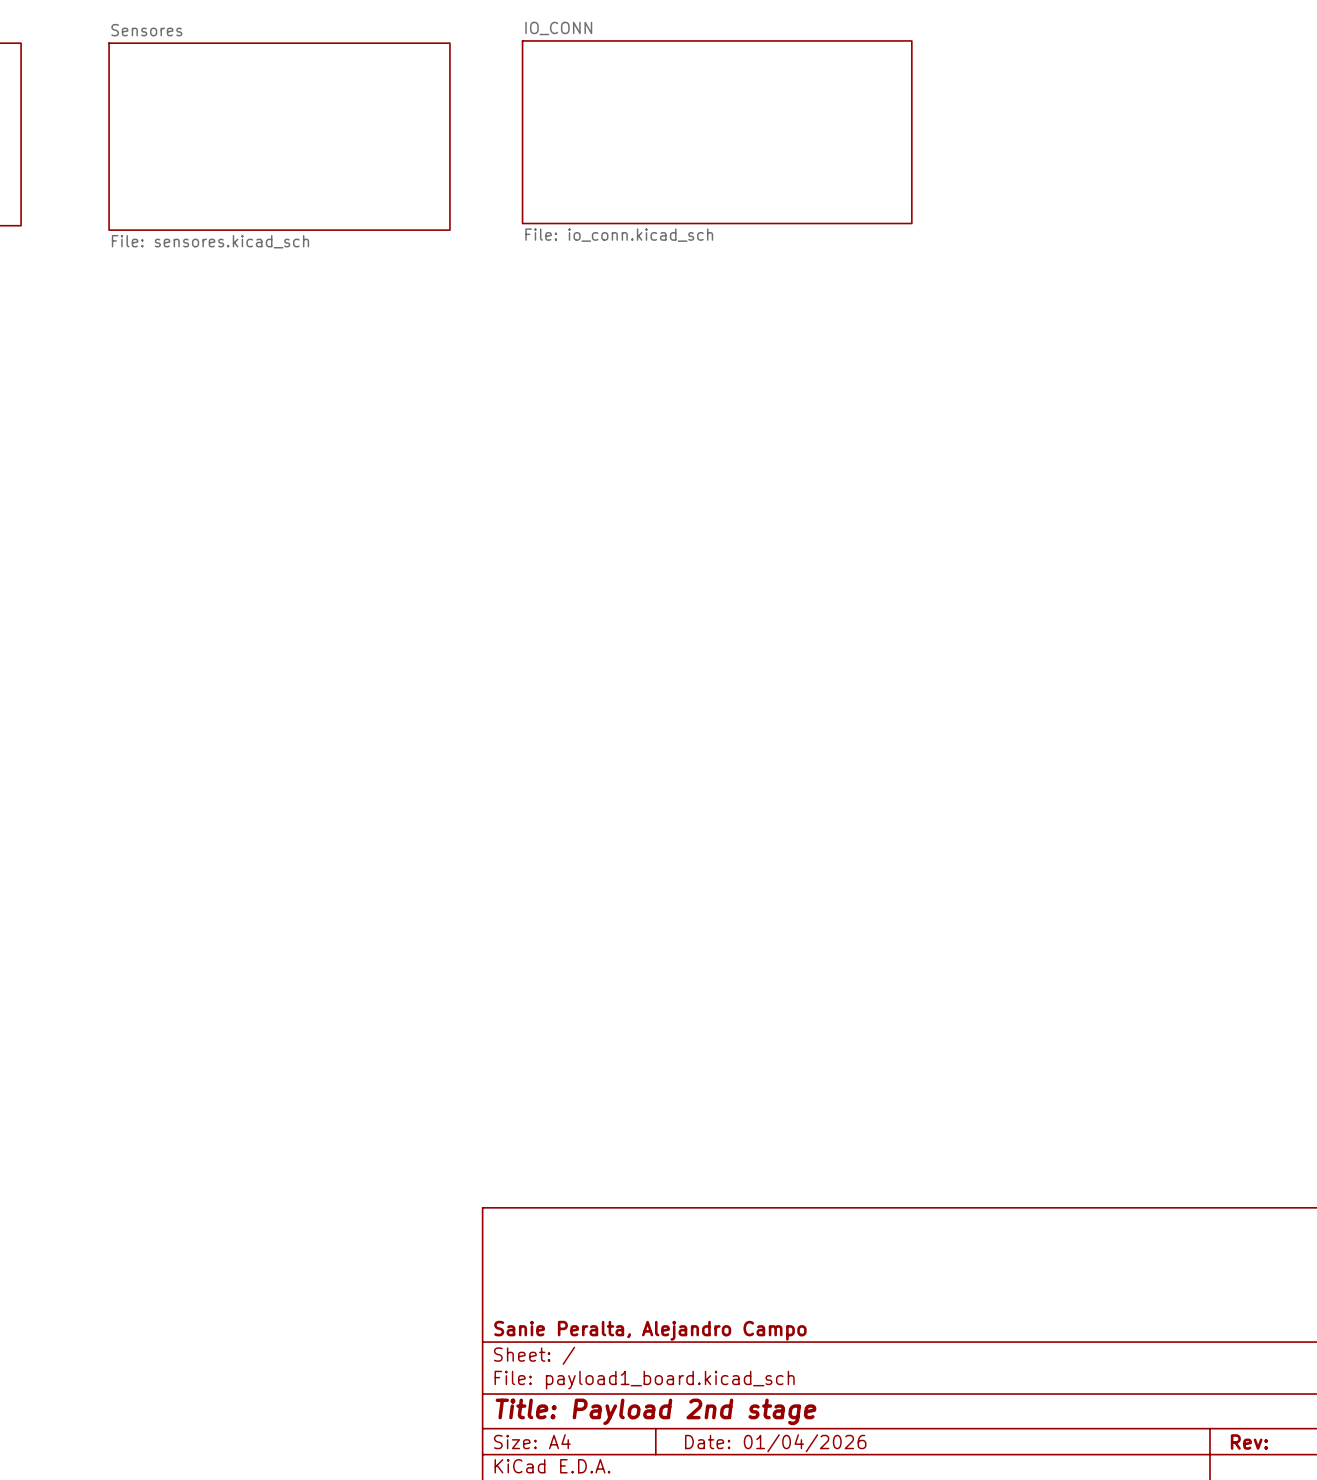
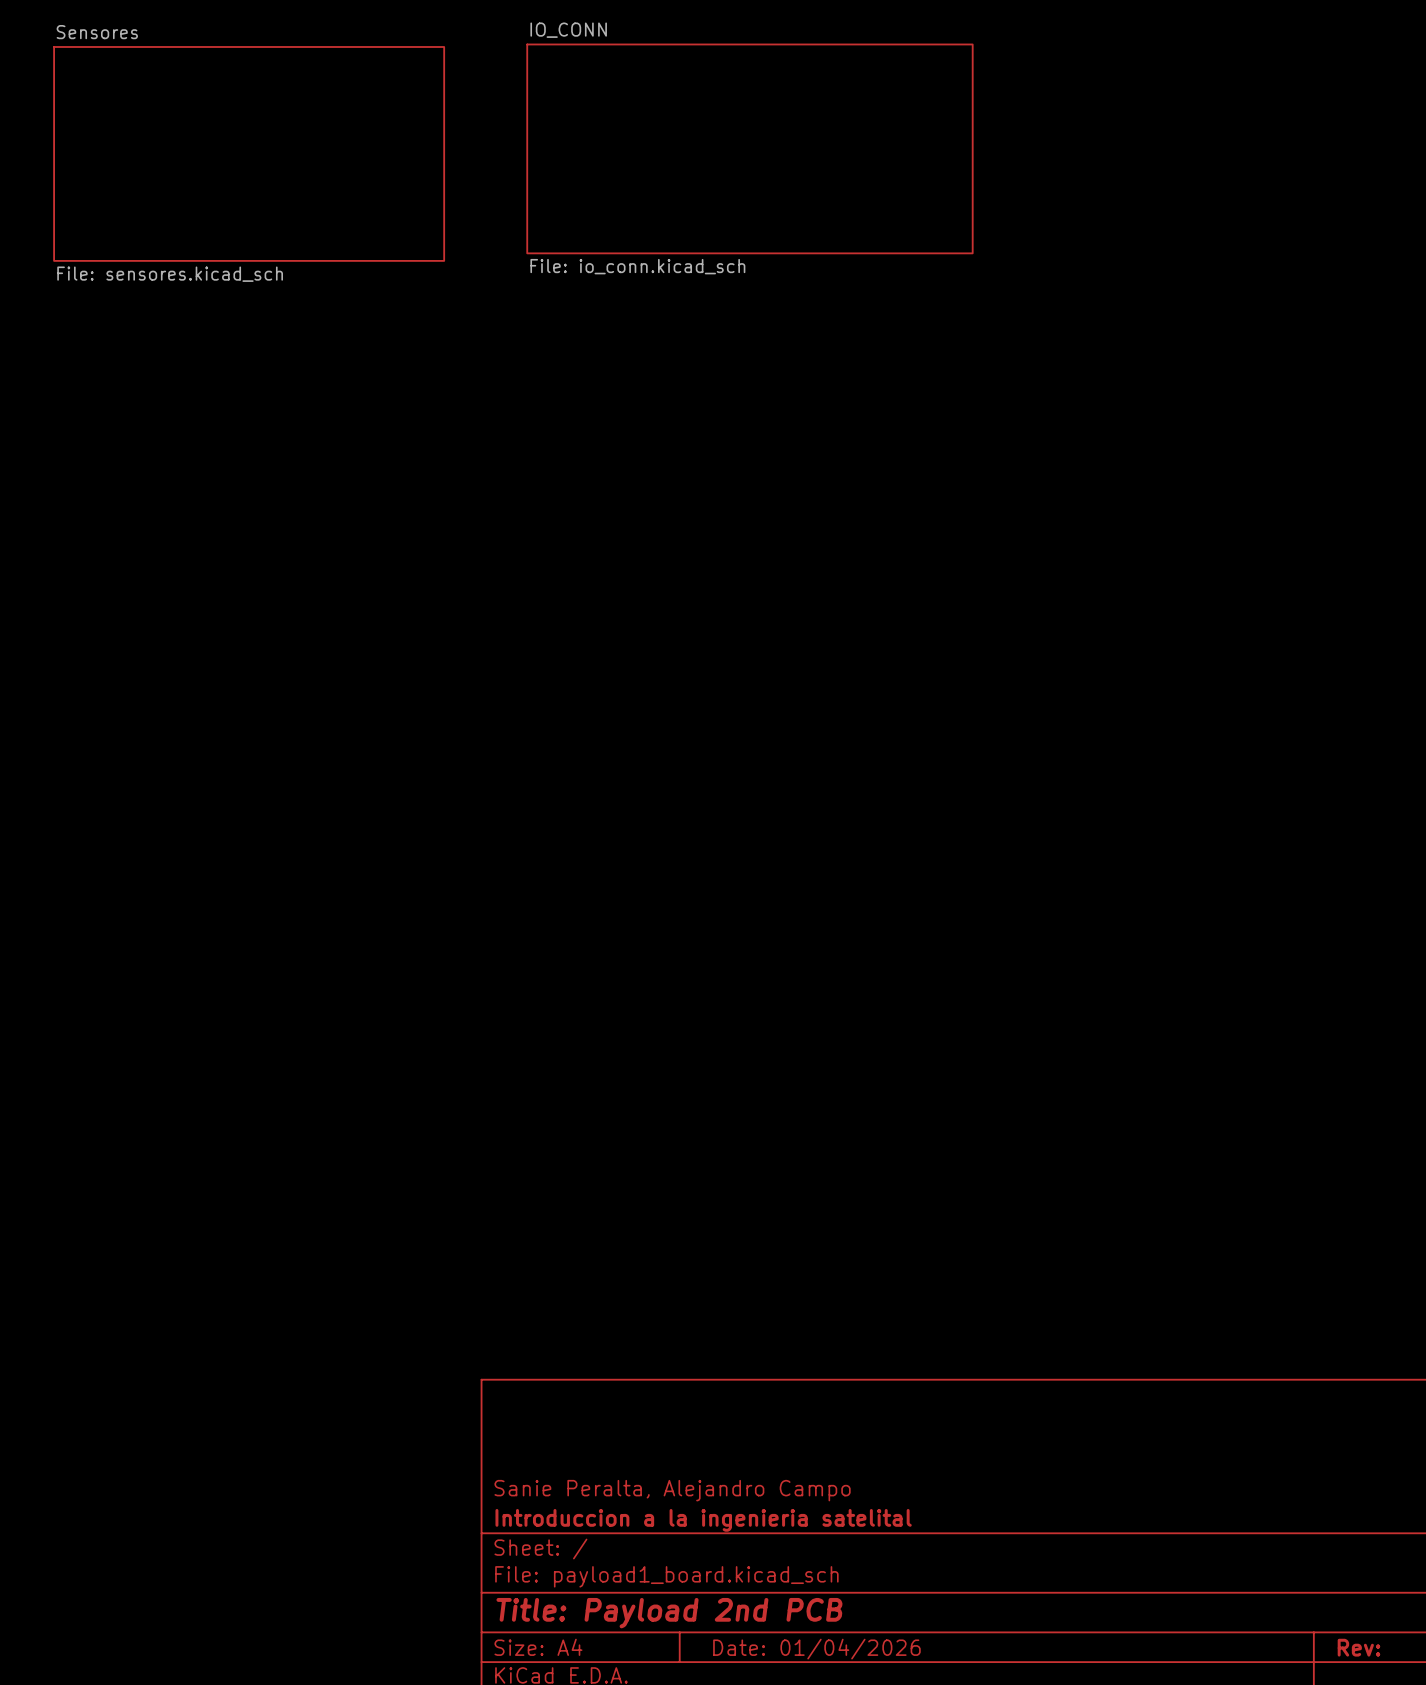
title block: none -> Sanie Peralta, Alejandro Campo (672, 1490)
title block: Sanie Peralta, Alejandro Campo (650, 1330) -> Introduccion a la ingenieria satelital (703, 1520)
title block: Title: Payload 2nd stage (656, 1411) -> Title: Payload 2nd PCB (669, 1613)

